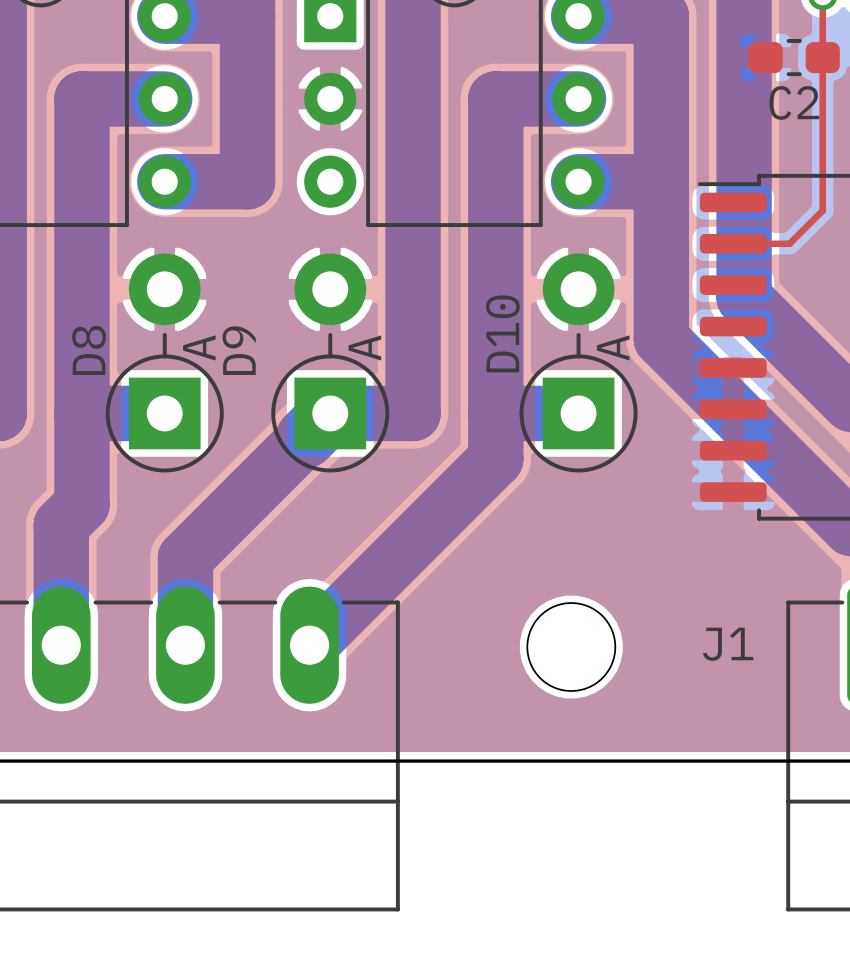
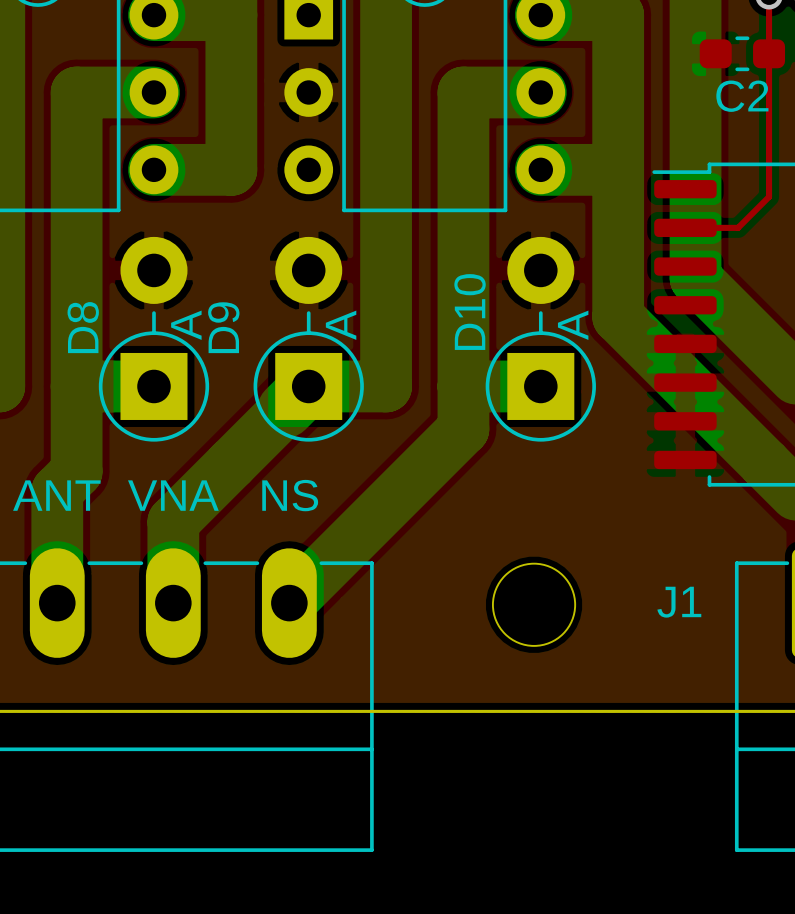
text: none -> ANT (56, 495)
text: none -> VNA (173, 495)
text: none -> NS (290, 495)

